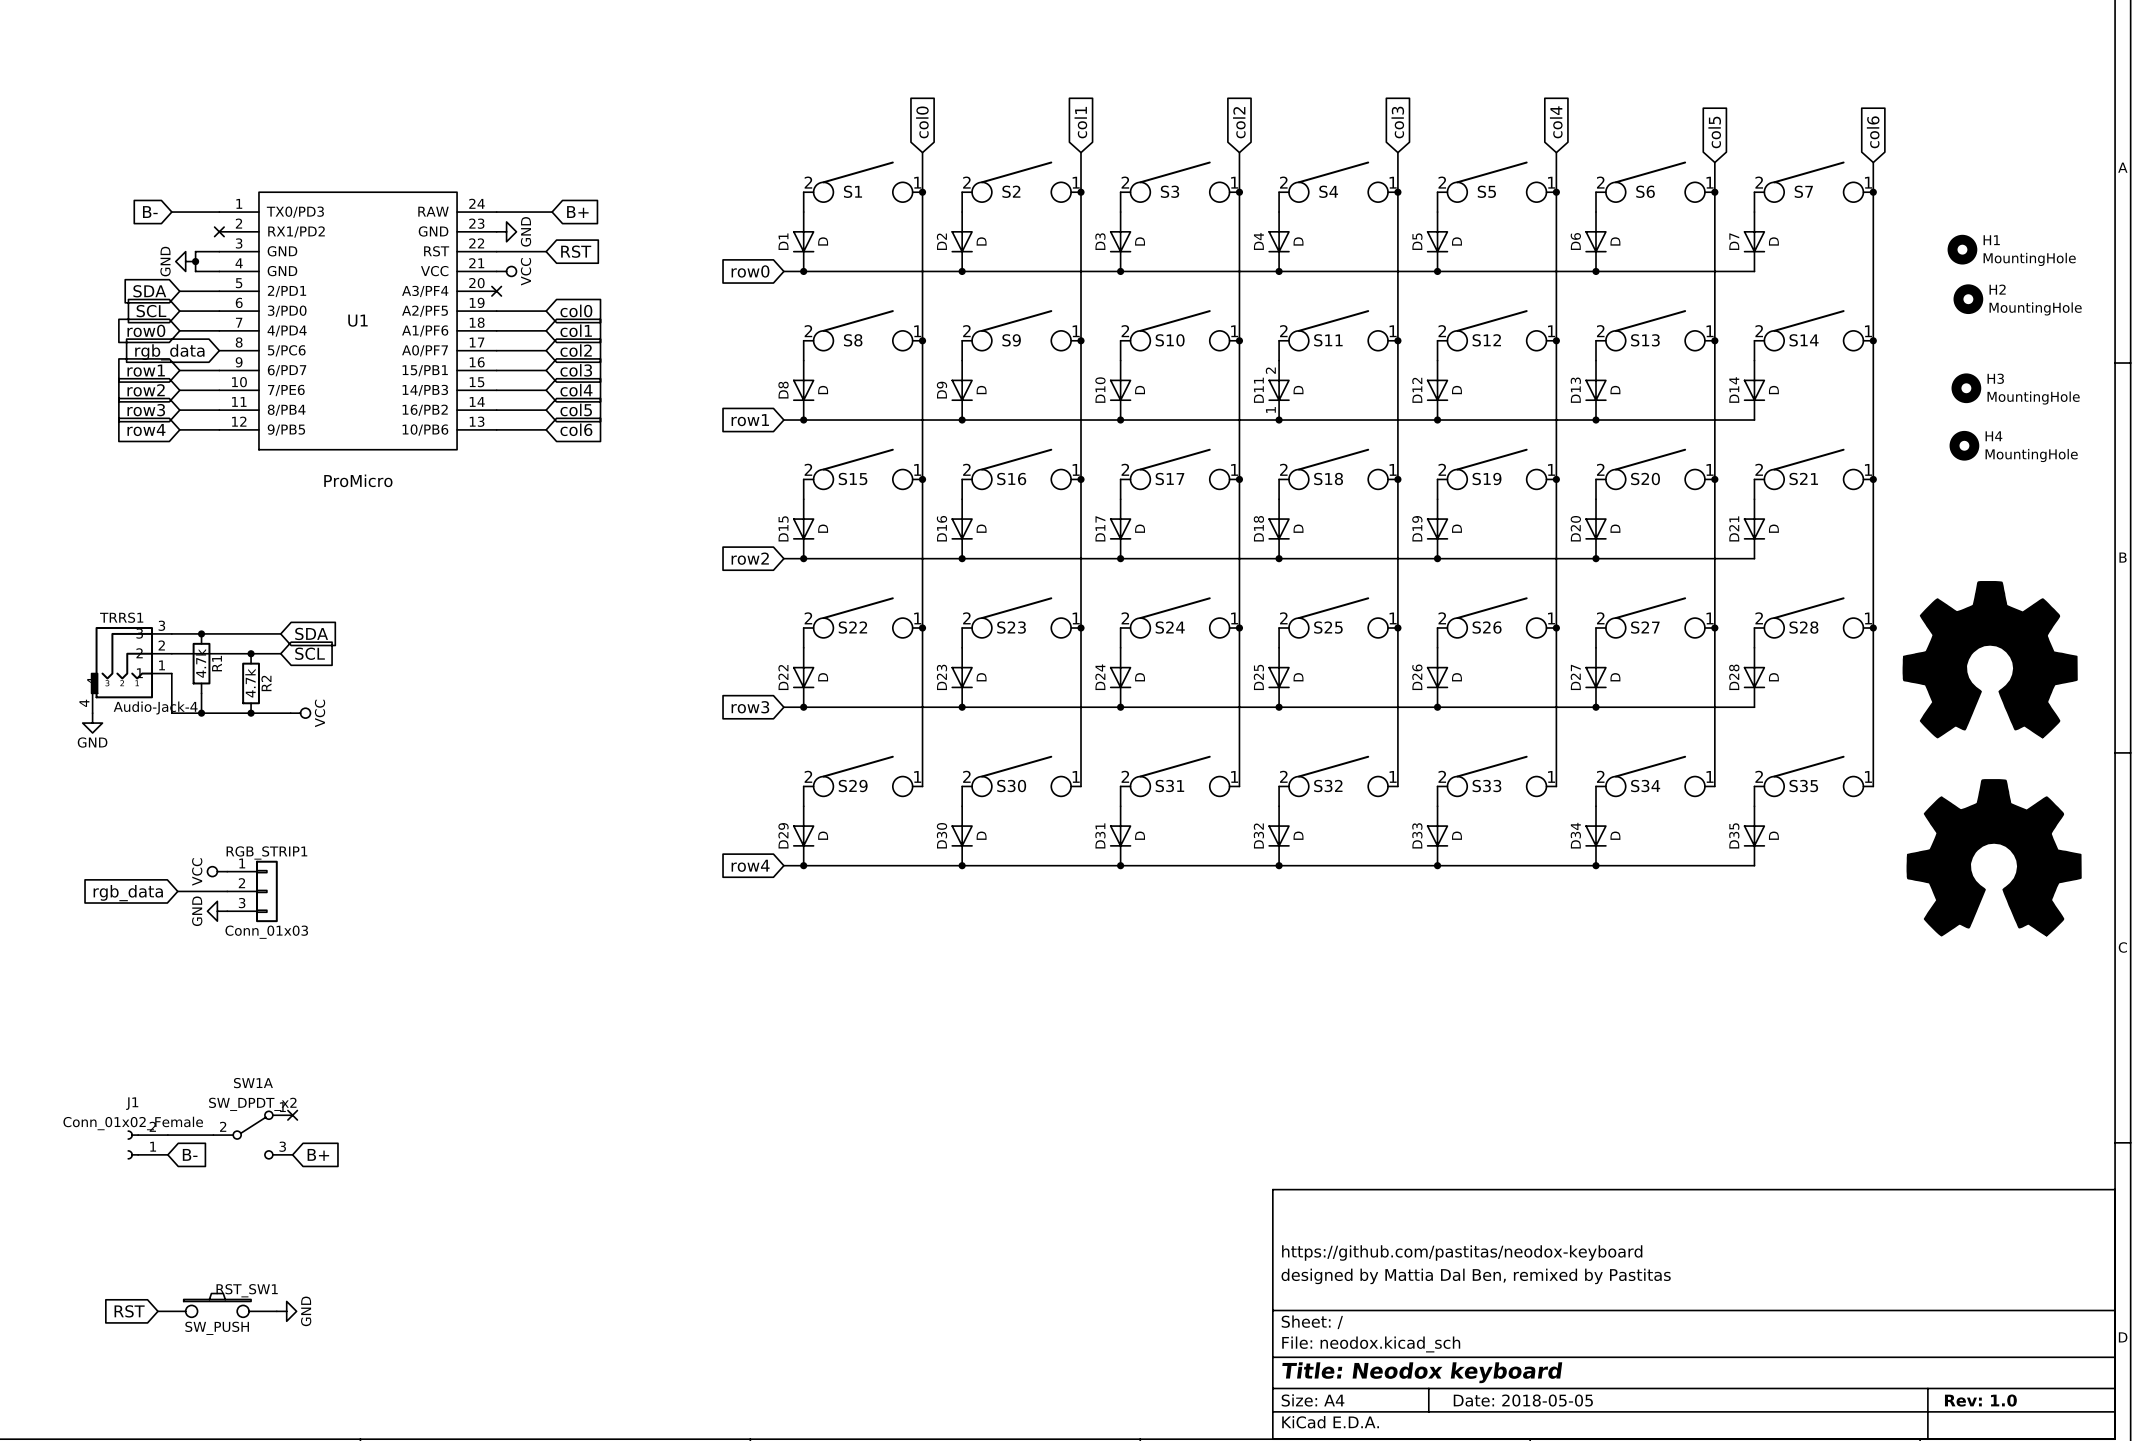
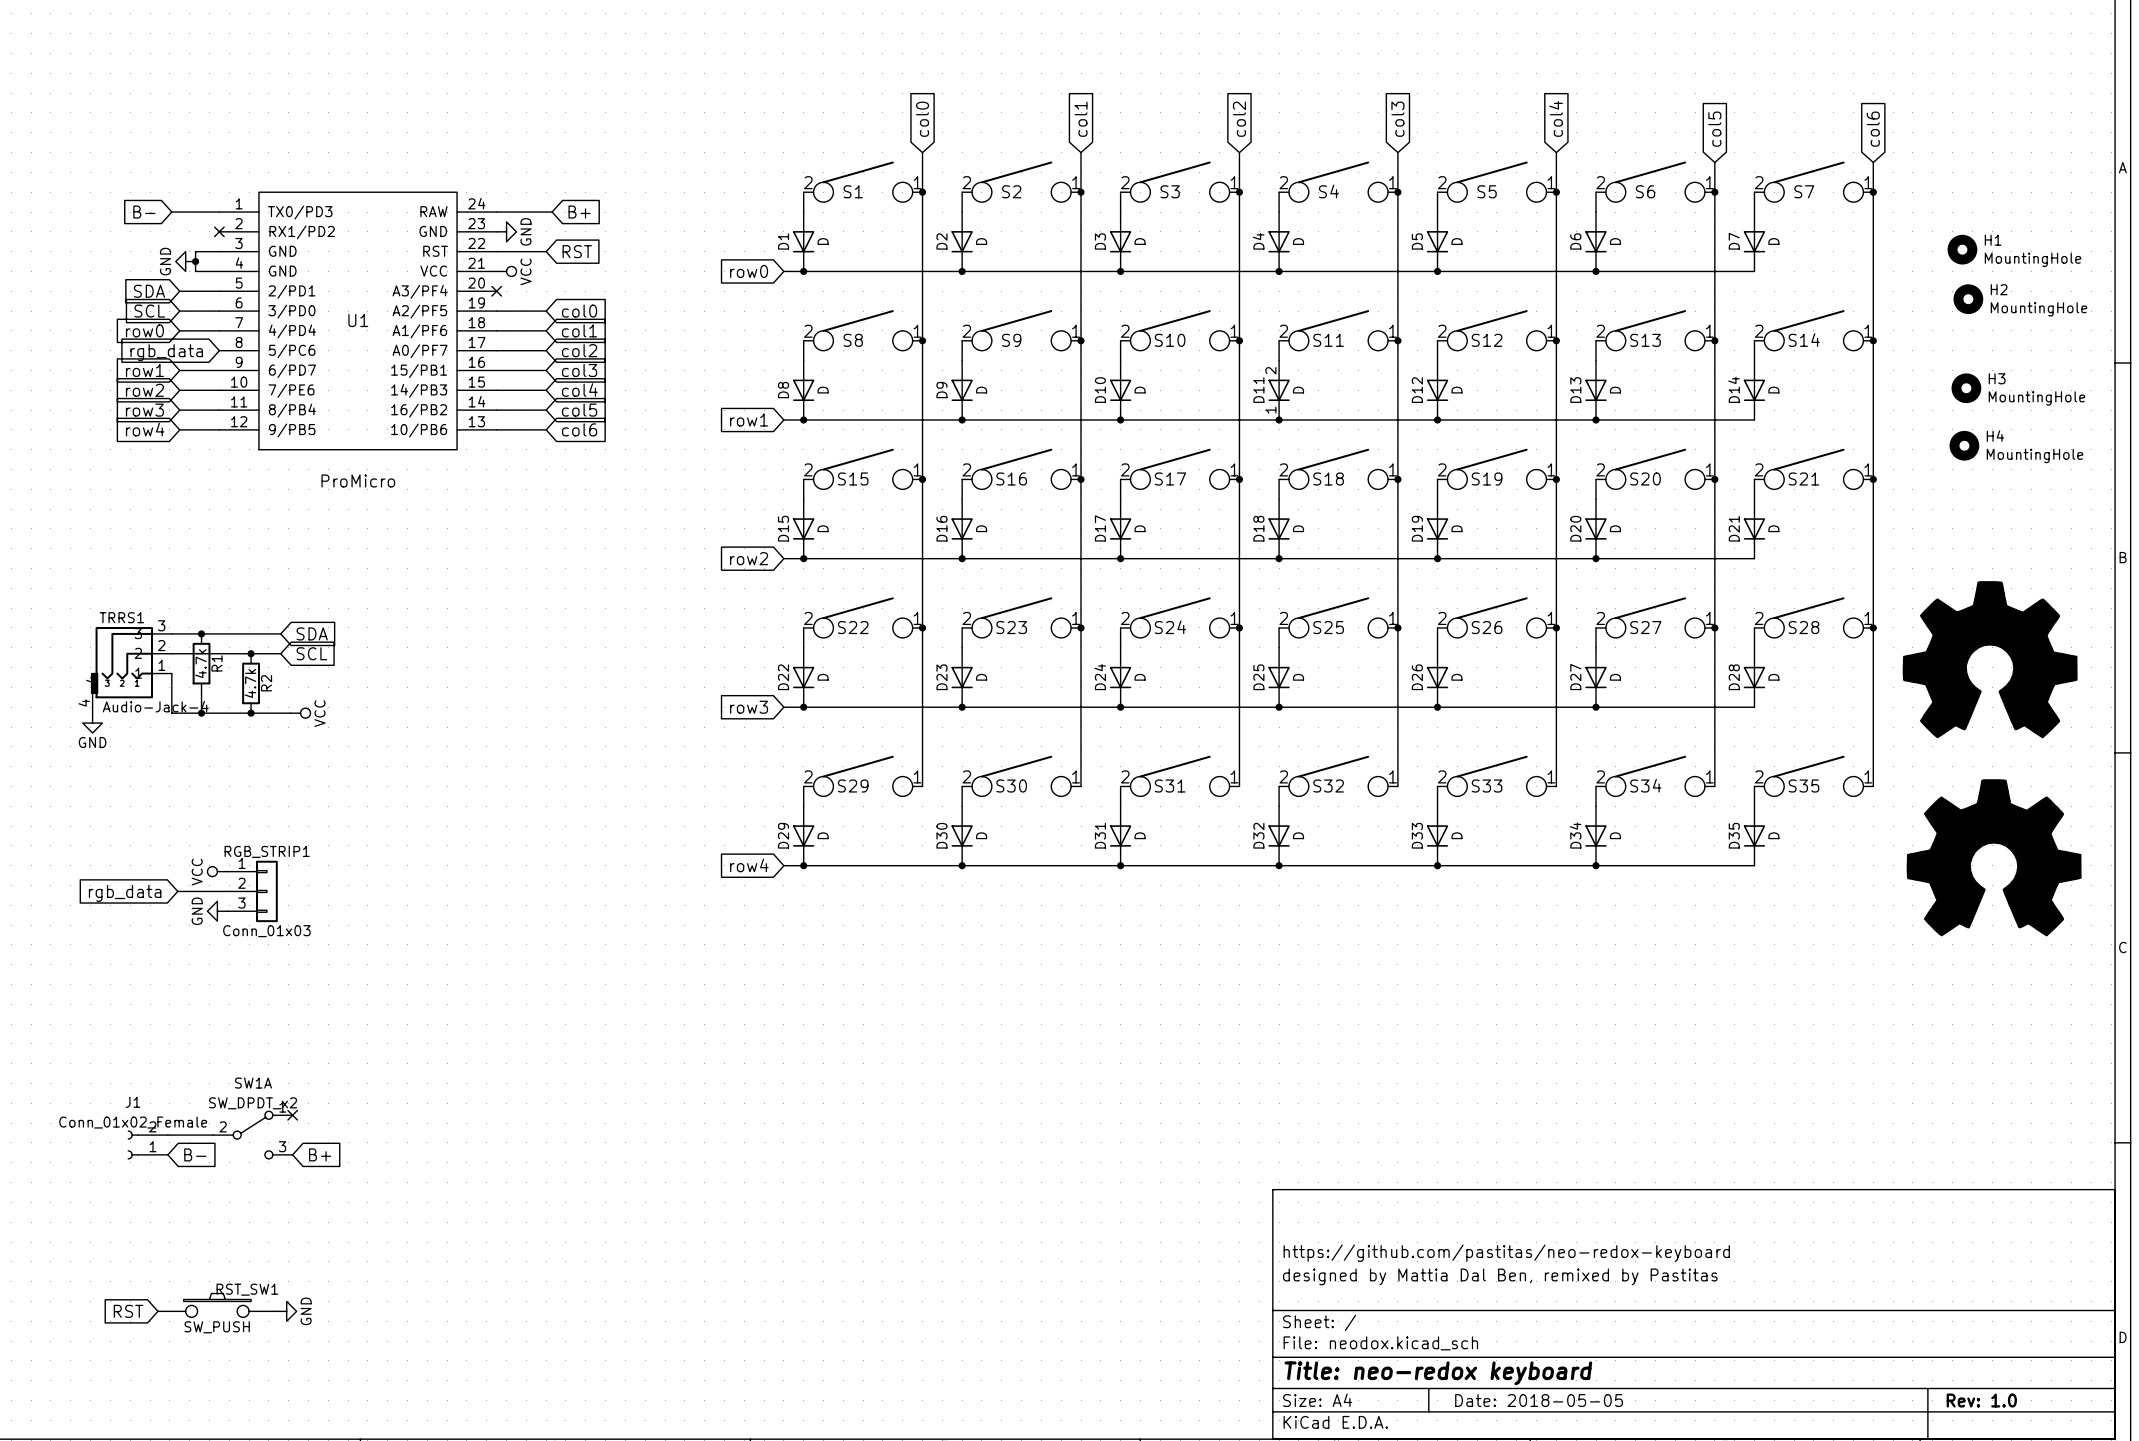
title block: https://github.com/pastitas/neodox-keyboard (1462, 1253) -> https://github.com/pastitas/neo-redox-keyboard (1506, 1253)
title block: Title: Neodox keyboard (1422, 1372) -> Title: neo-redox keyboard (1438, 1373)

